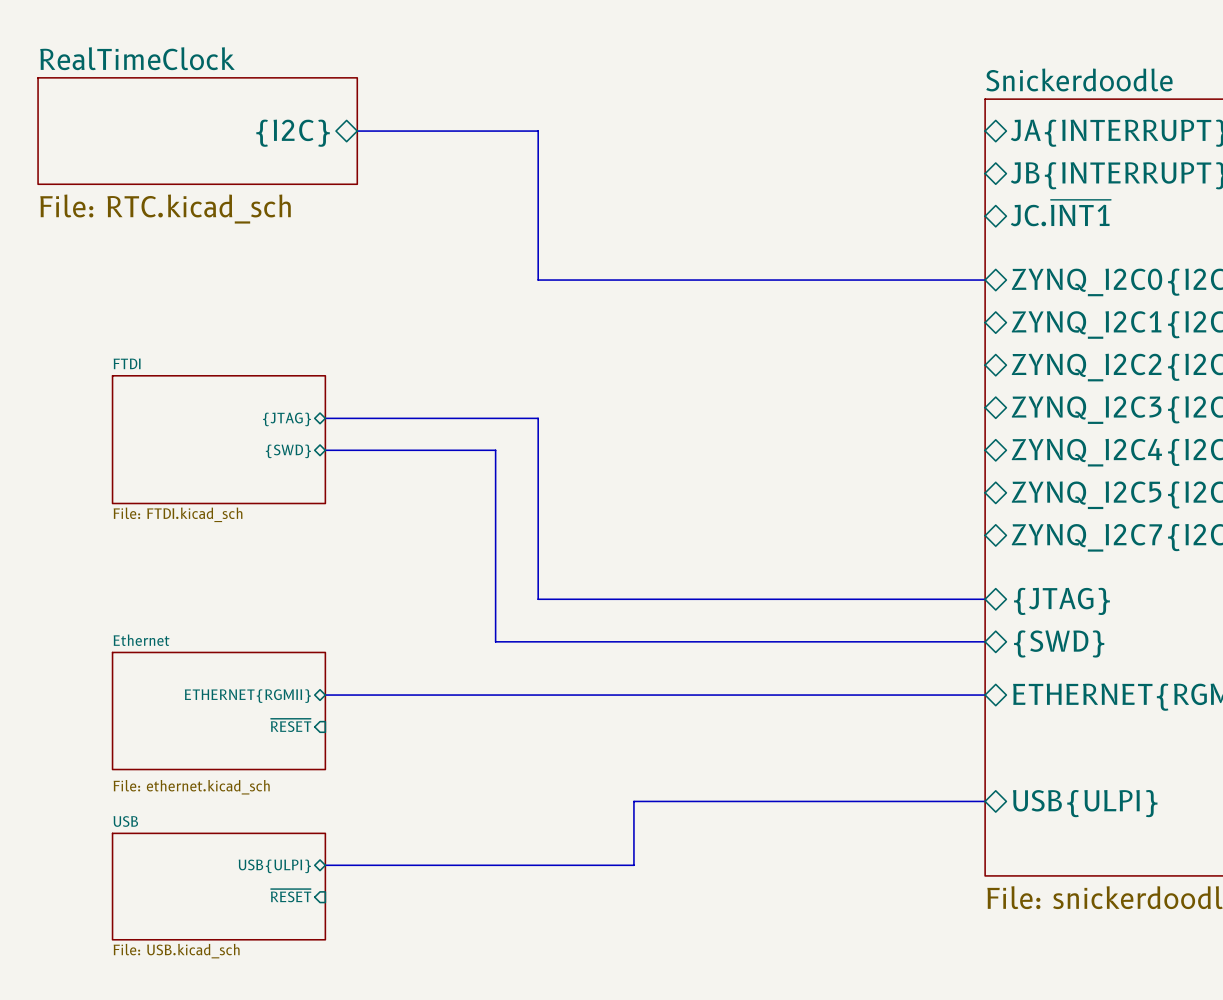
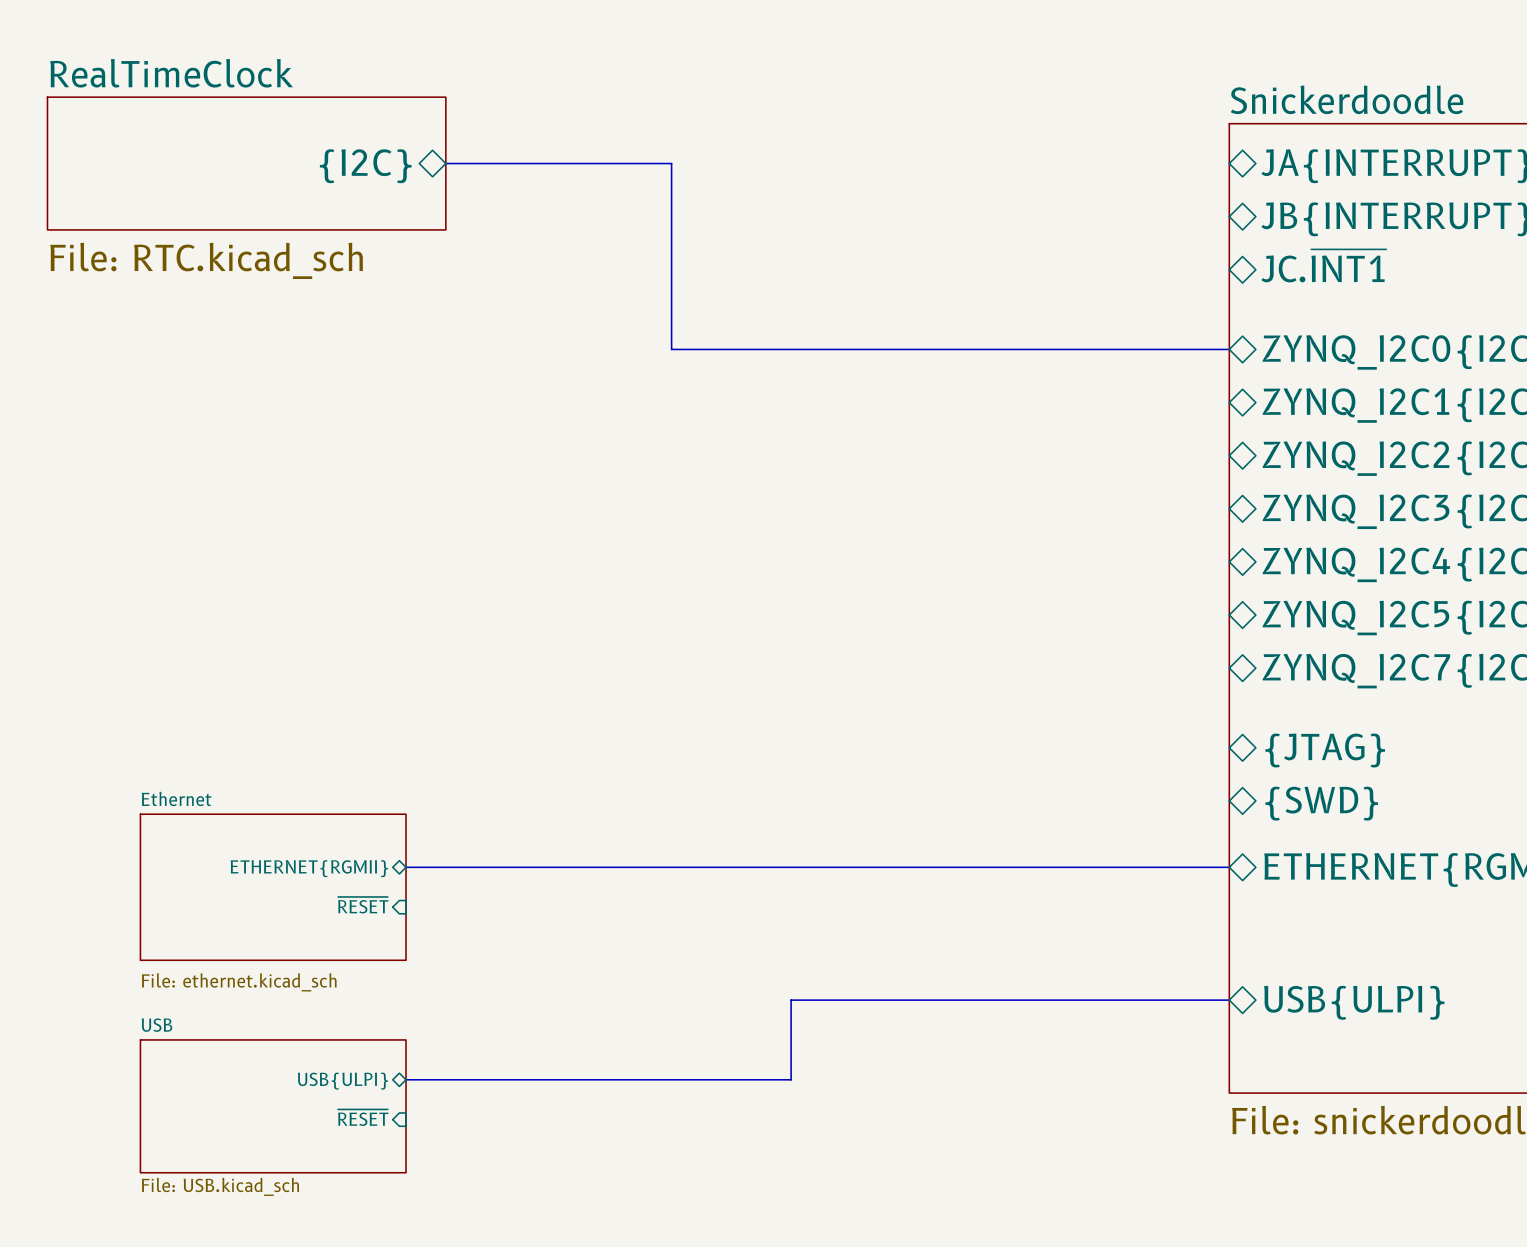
bus: (325, 418) (538, 418) (538, 599) (985, 599) -> none
sheet pin: {JTAG} (287, 419) -> none
sheet FTDI: File: FTDI.kicad_sch (218, 439) -> none
bus: (325, 450) (495, 450) (495, 641) (985, 641) -> none
sheet pin: {SWD} (288, 451) -> none

